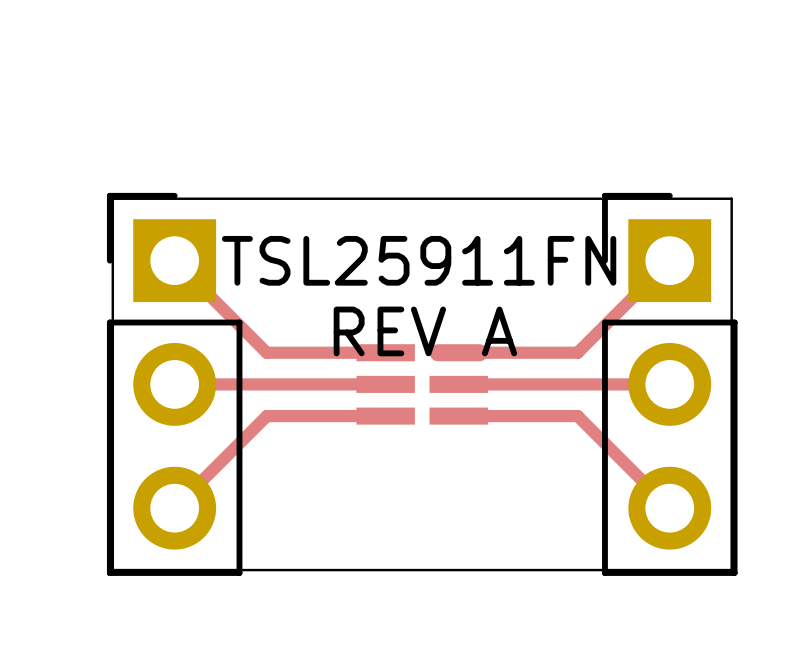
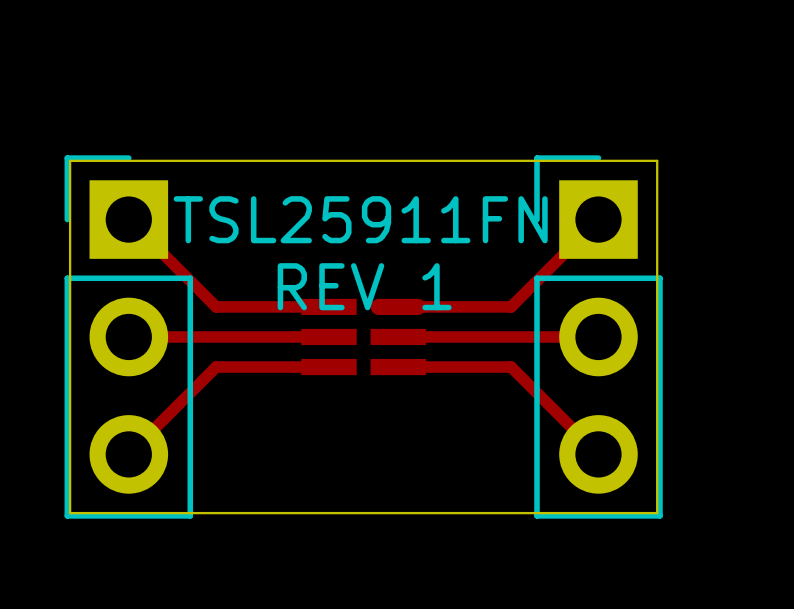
text: REV A (425, 331) -> REV 1 (364, 286)

